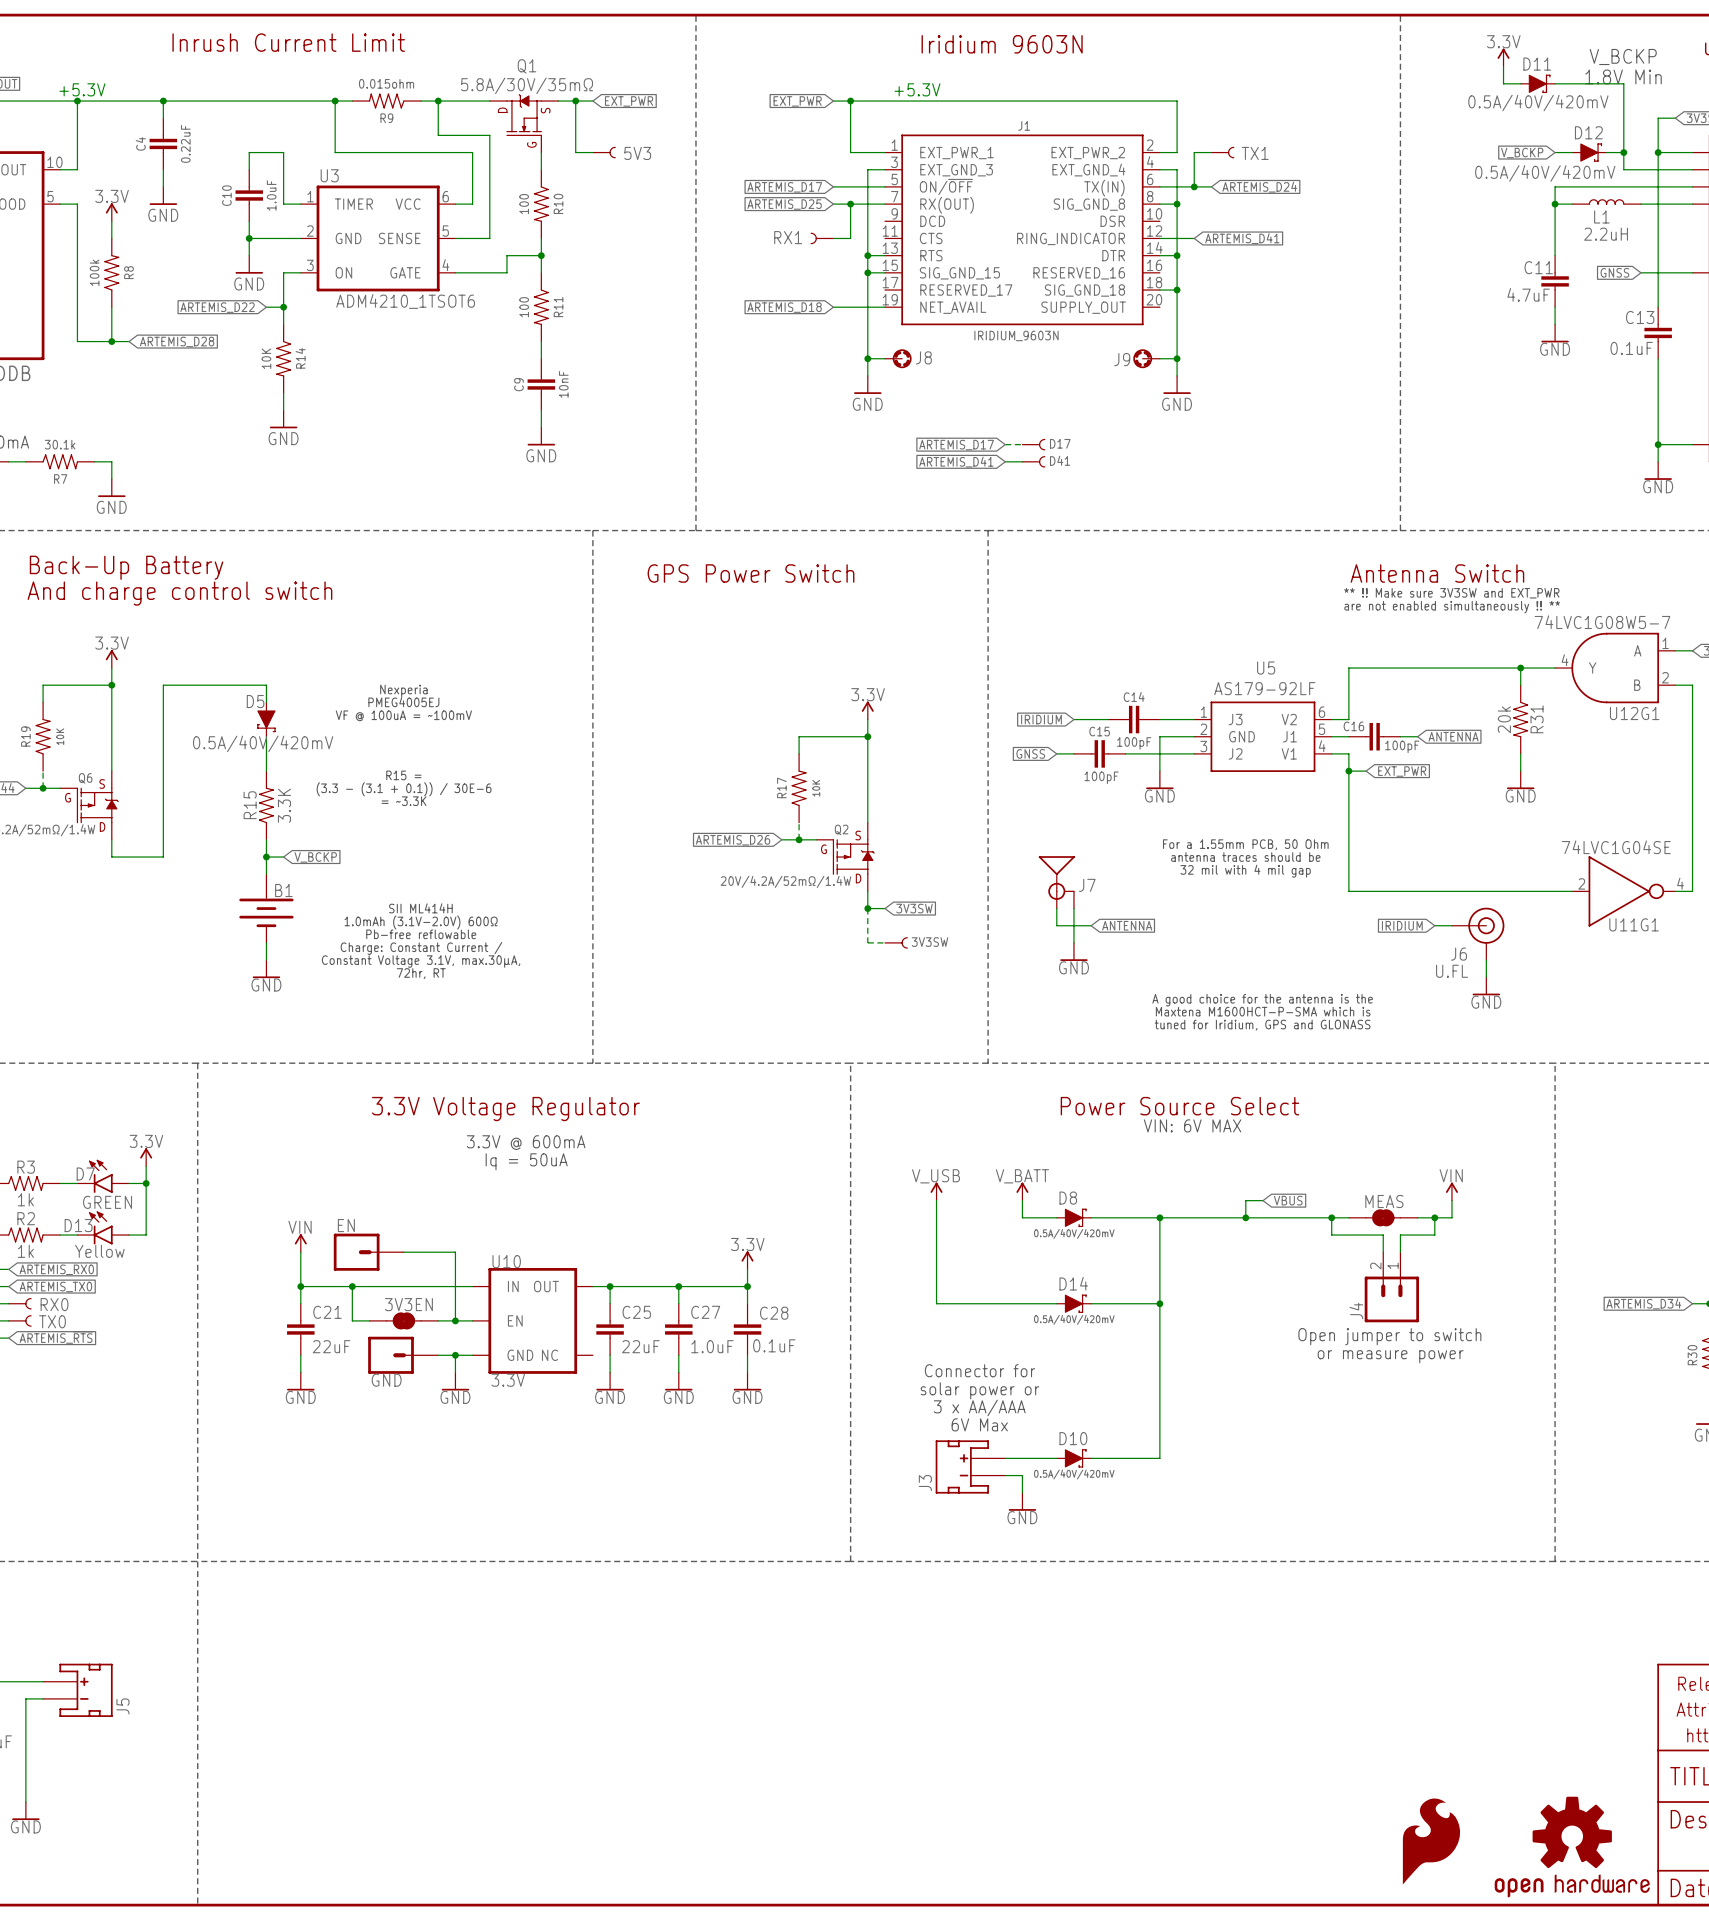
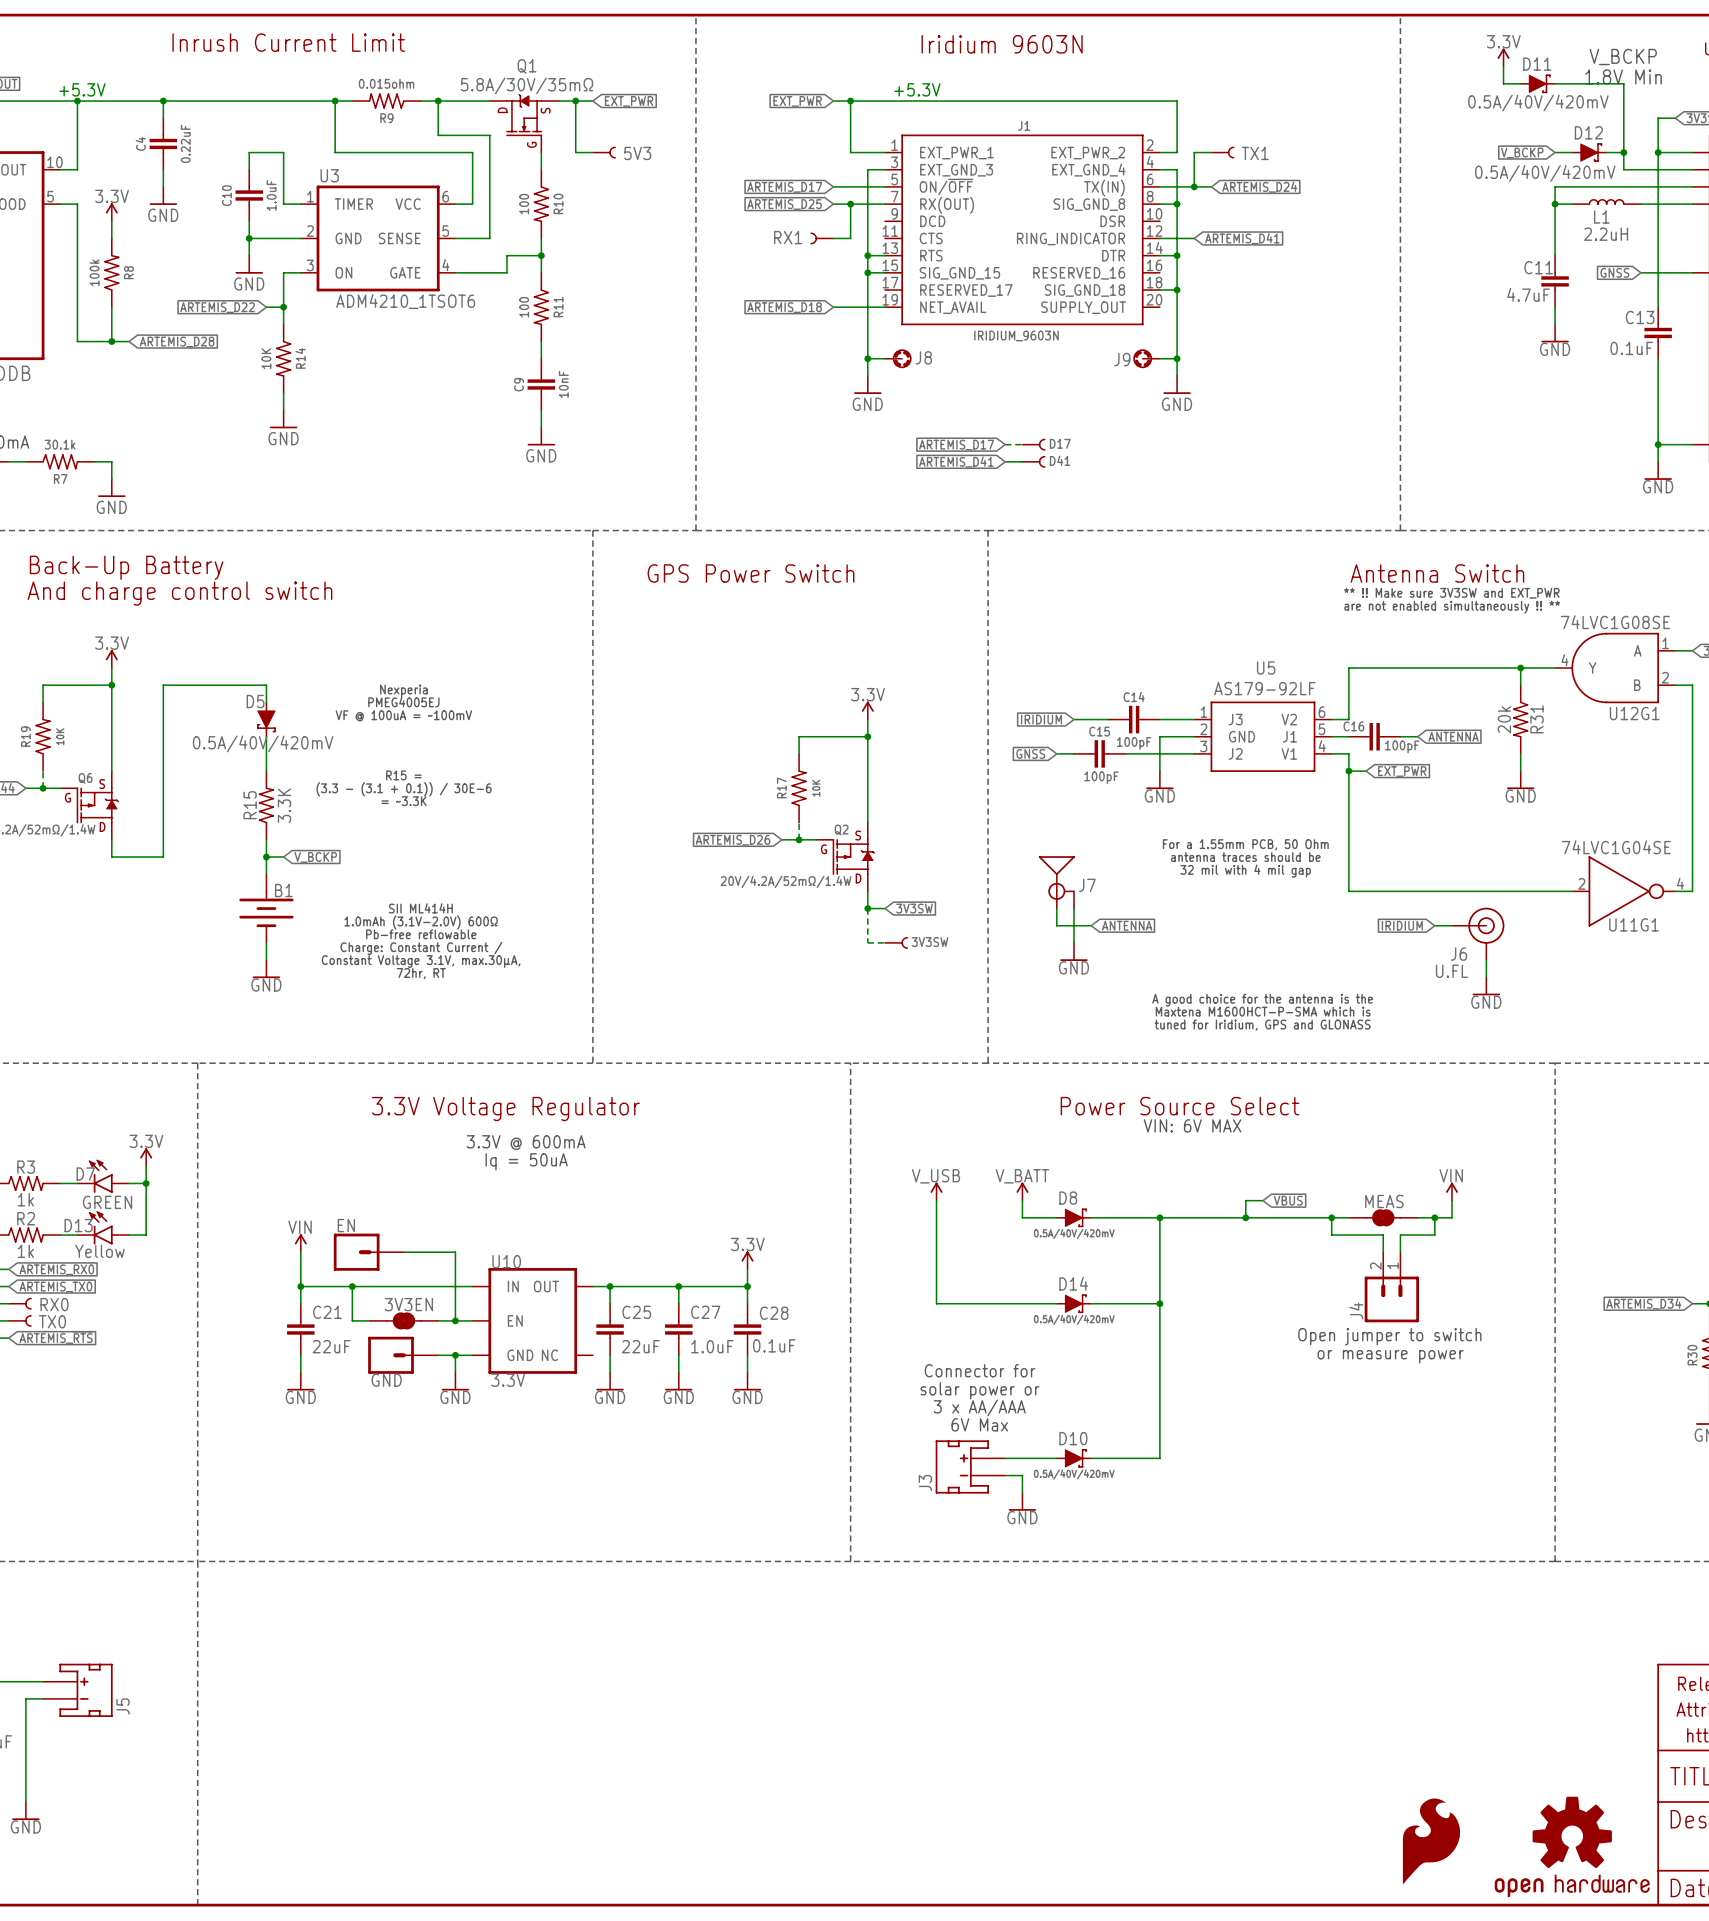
U12G1 value: 74LVC1G08W5-7 (1602, 622) -> 74LVC1G08SE (1615, 622)

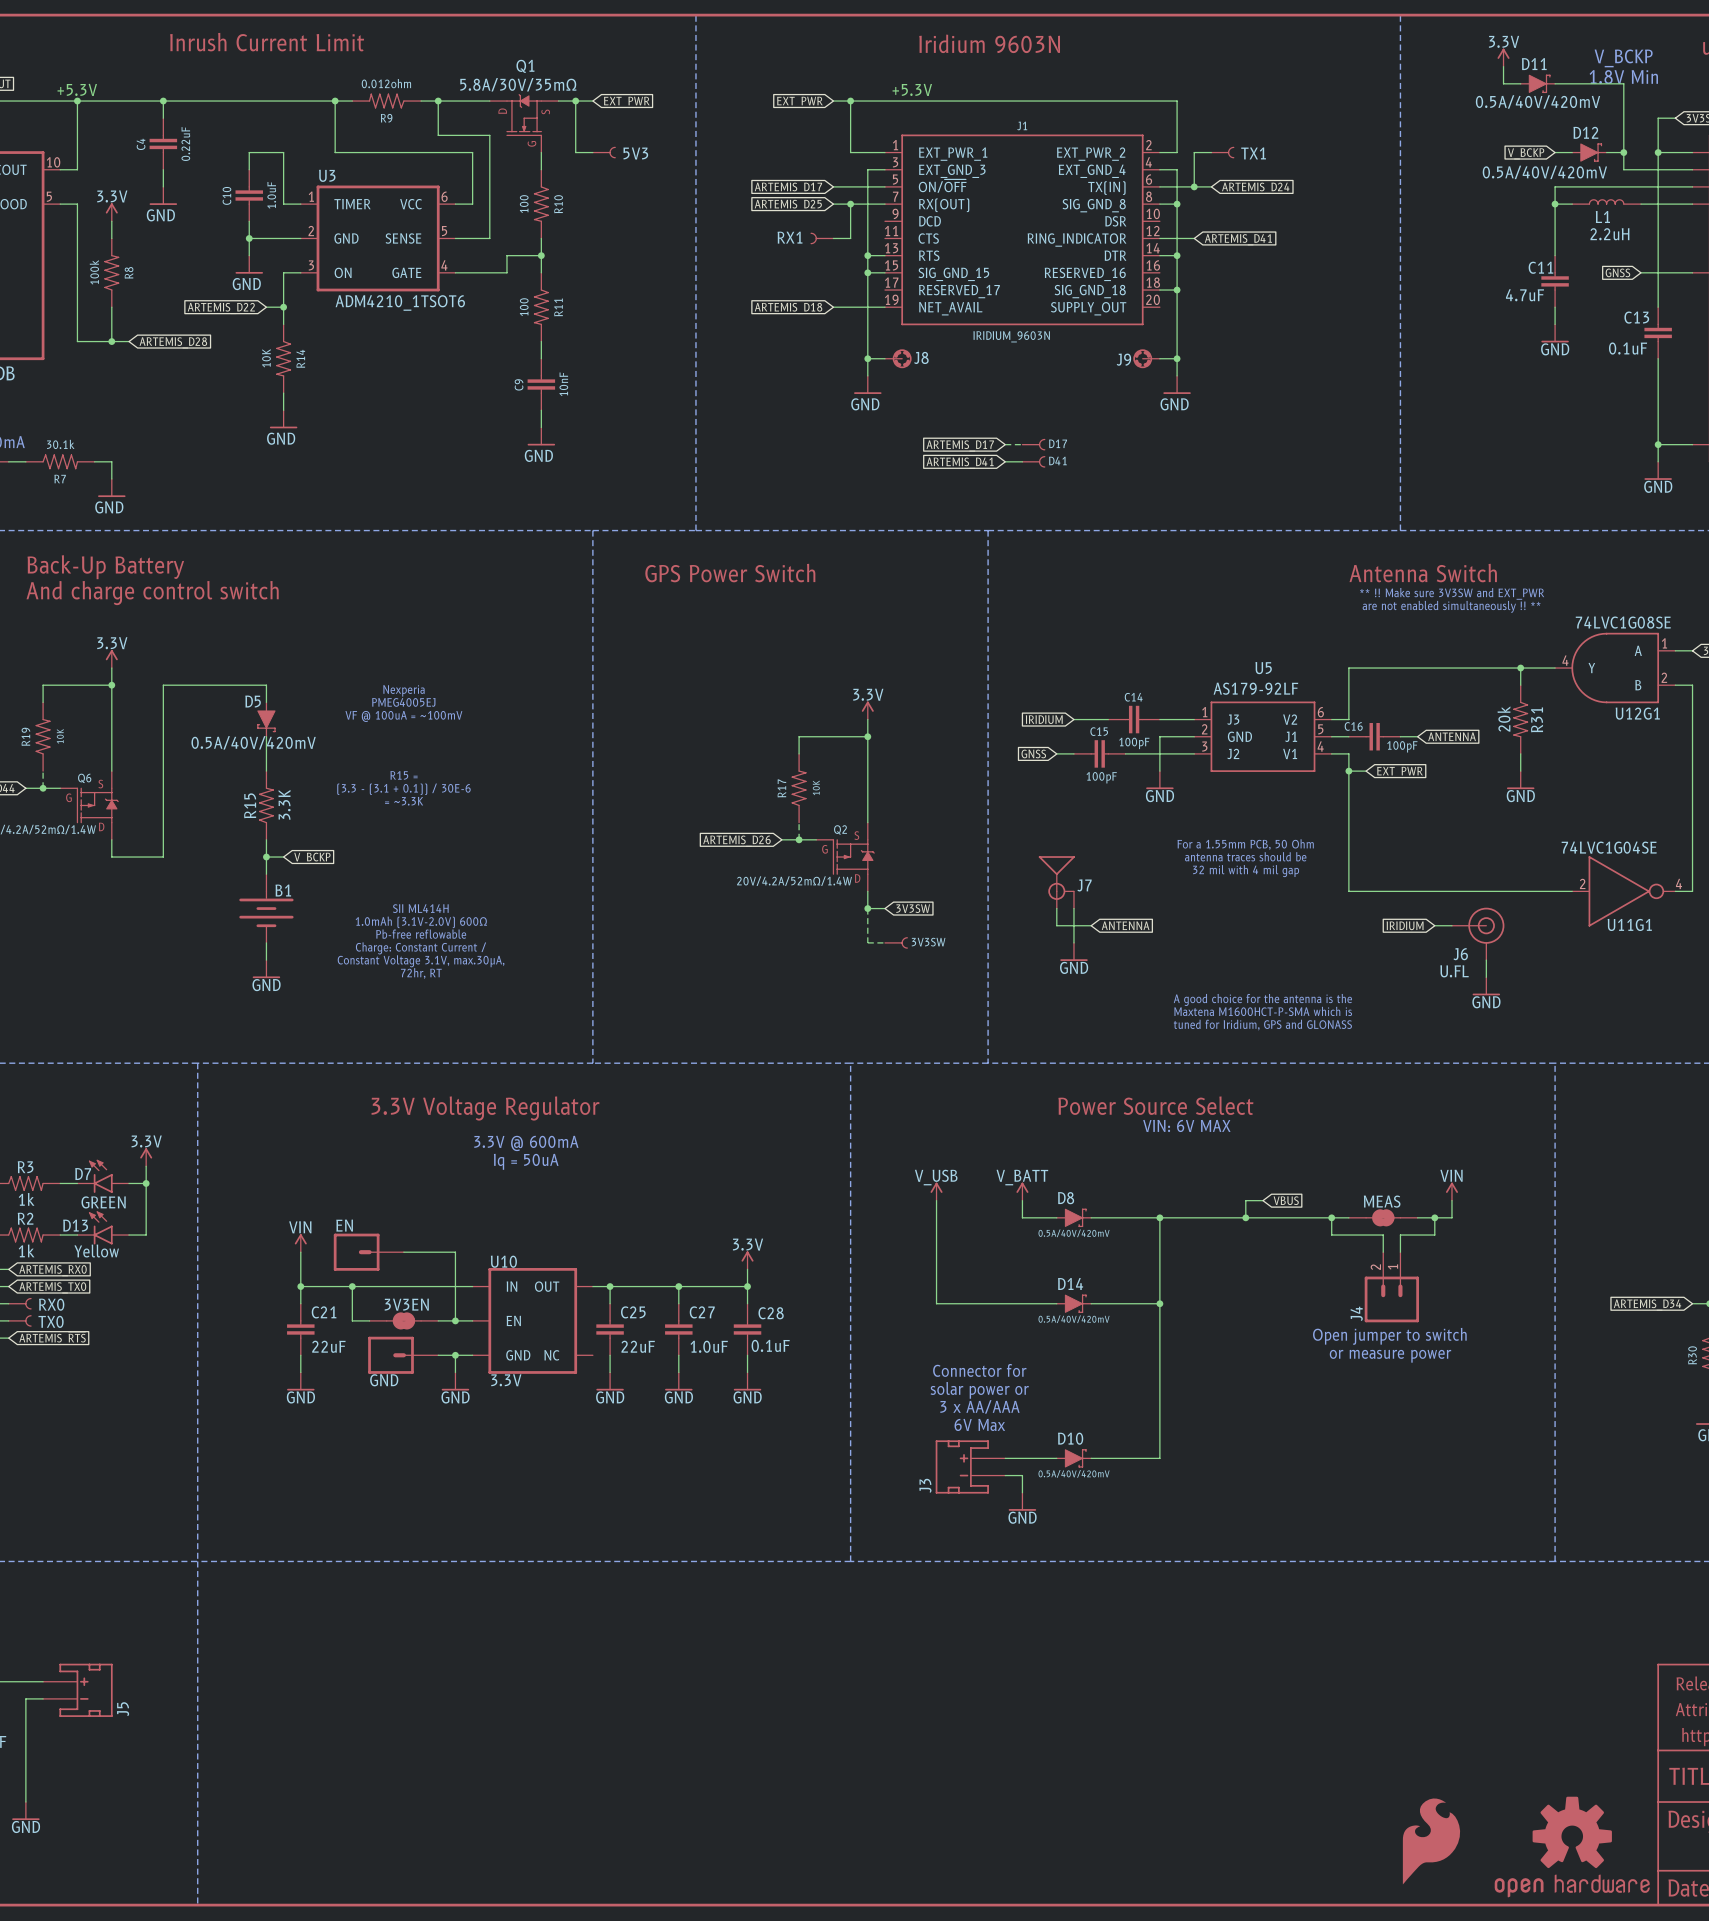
R9 value: 0.015ohm (386, 83) -> 0.012ohm (386, 83)

